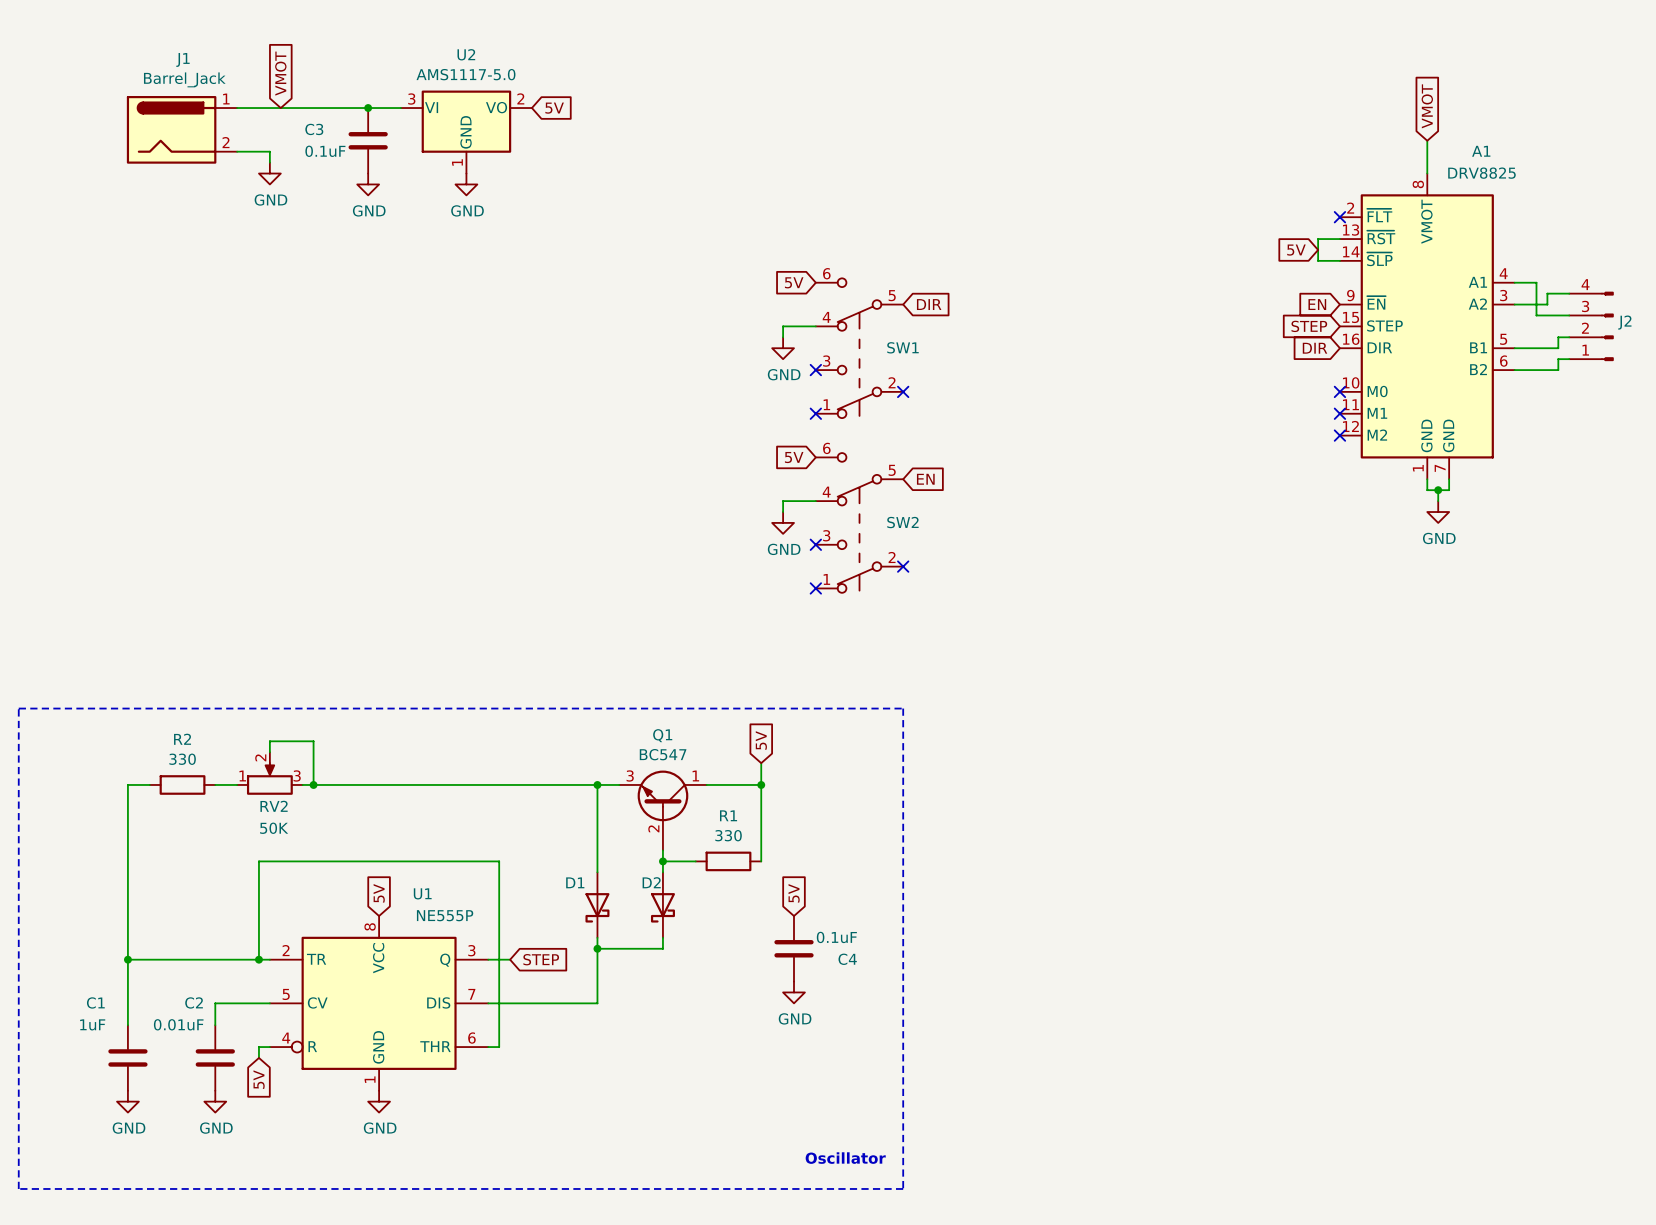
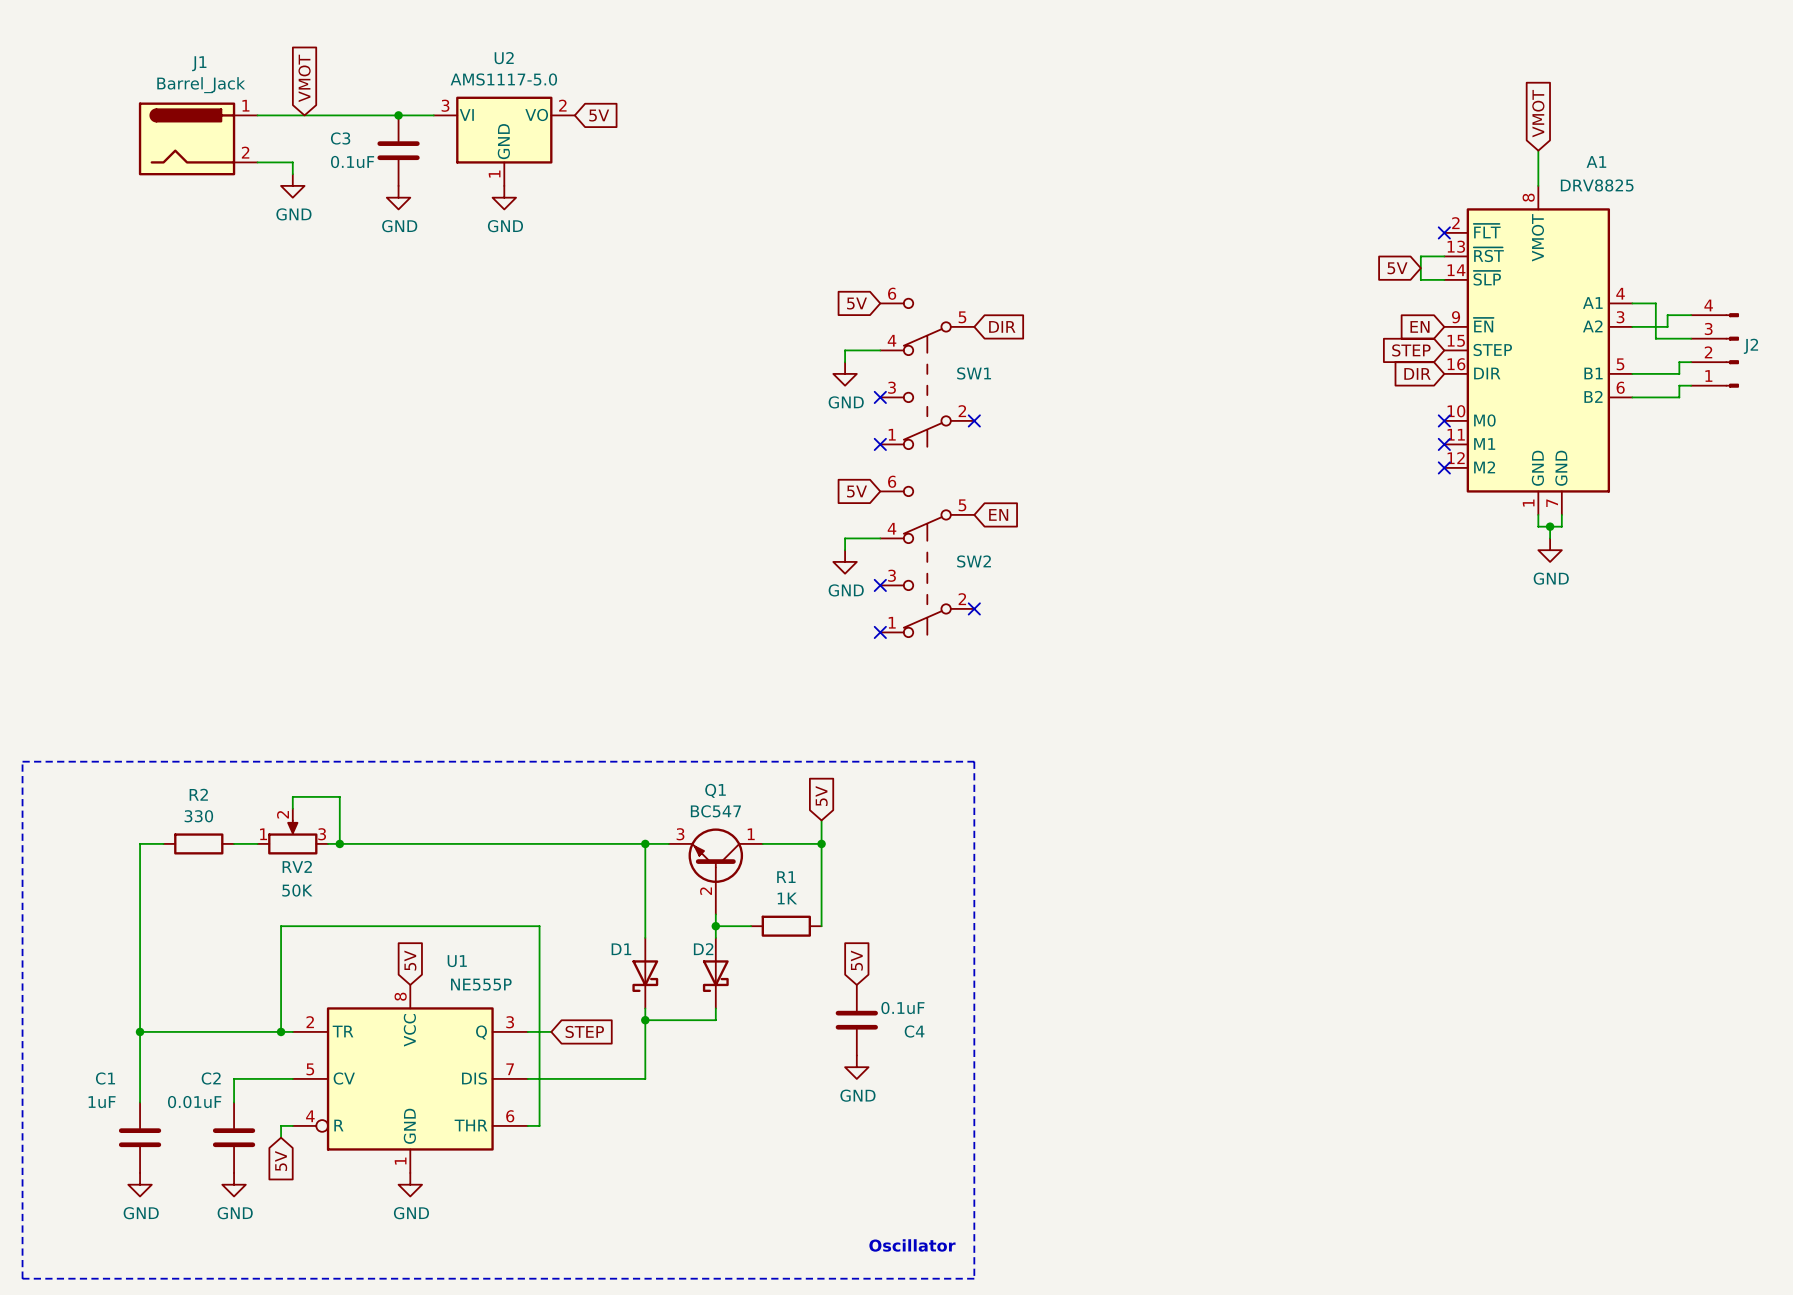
R1 value: 330 (728, 835) -> 1K (787, 898)

